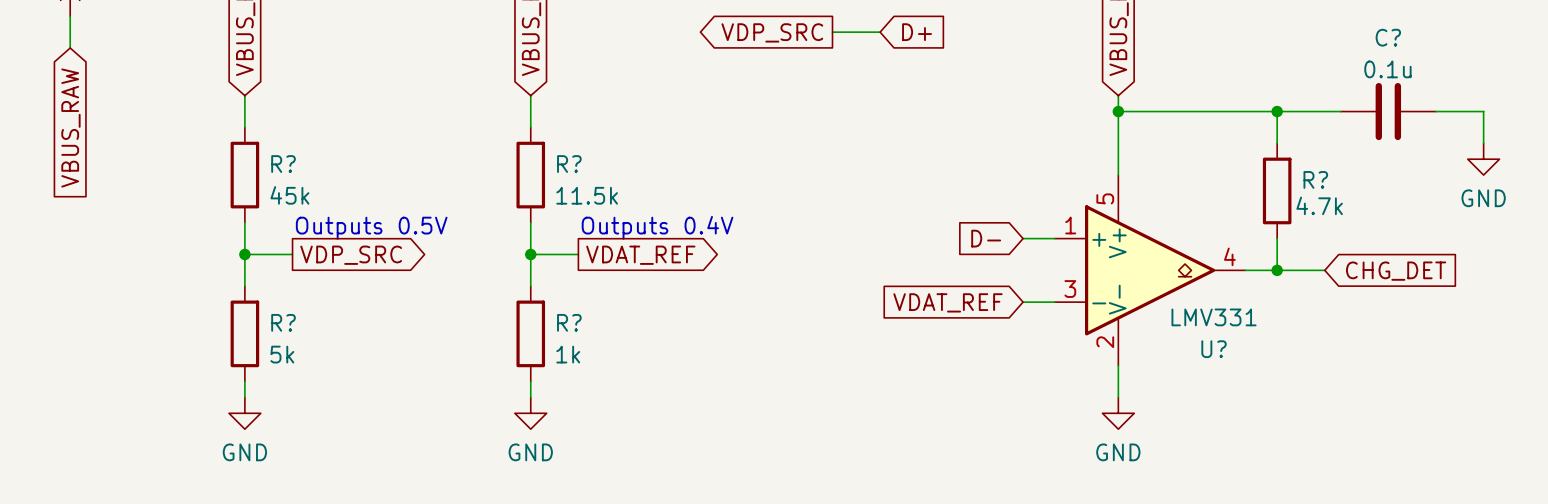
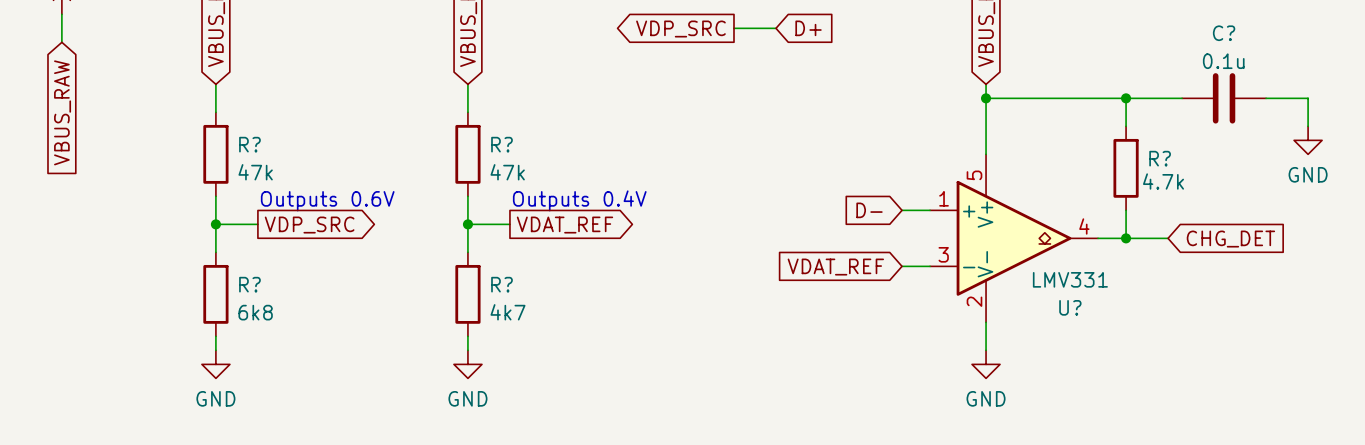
R? value: 45k (289, 195) -> 47k (255, 172)
R? value: 11.5k (587, 195) -> 47k (507, 172)
text: Outputs 0.5V (371, 228) -> Outputs 0.6V (327, 201)
R? value: 5k (282, 354) -> 6k8 (255, 312)
R? value: 1k (568, 354) -> 4k7 (508, 312)

